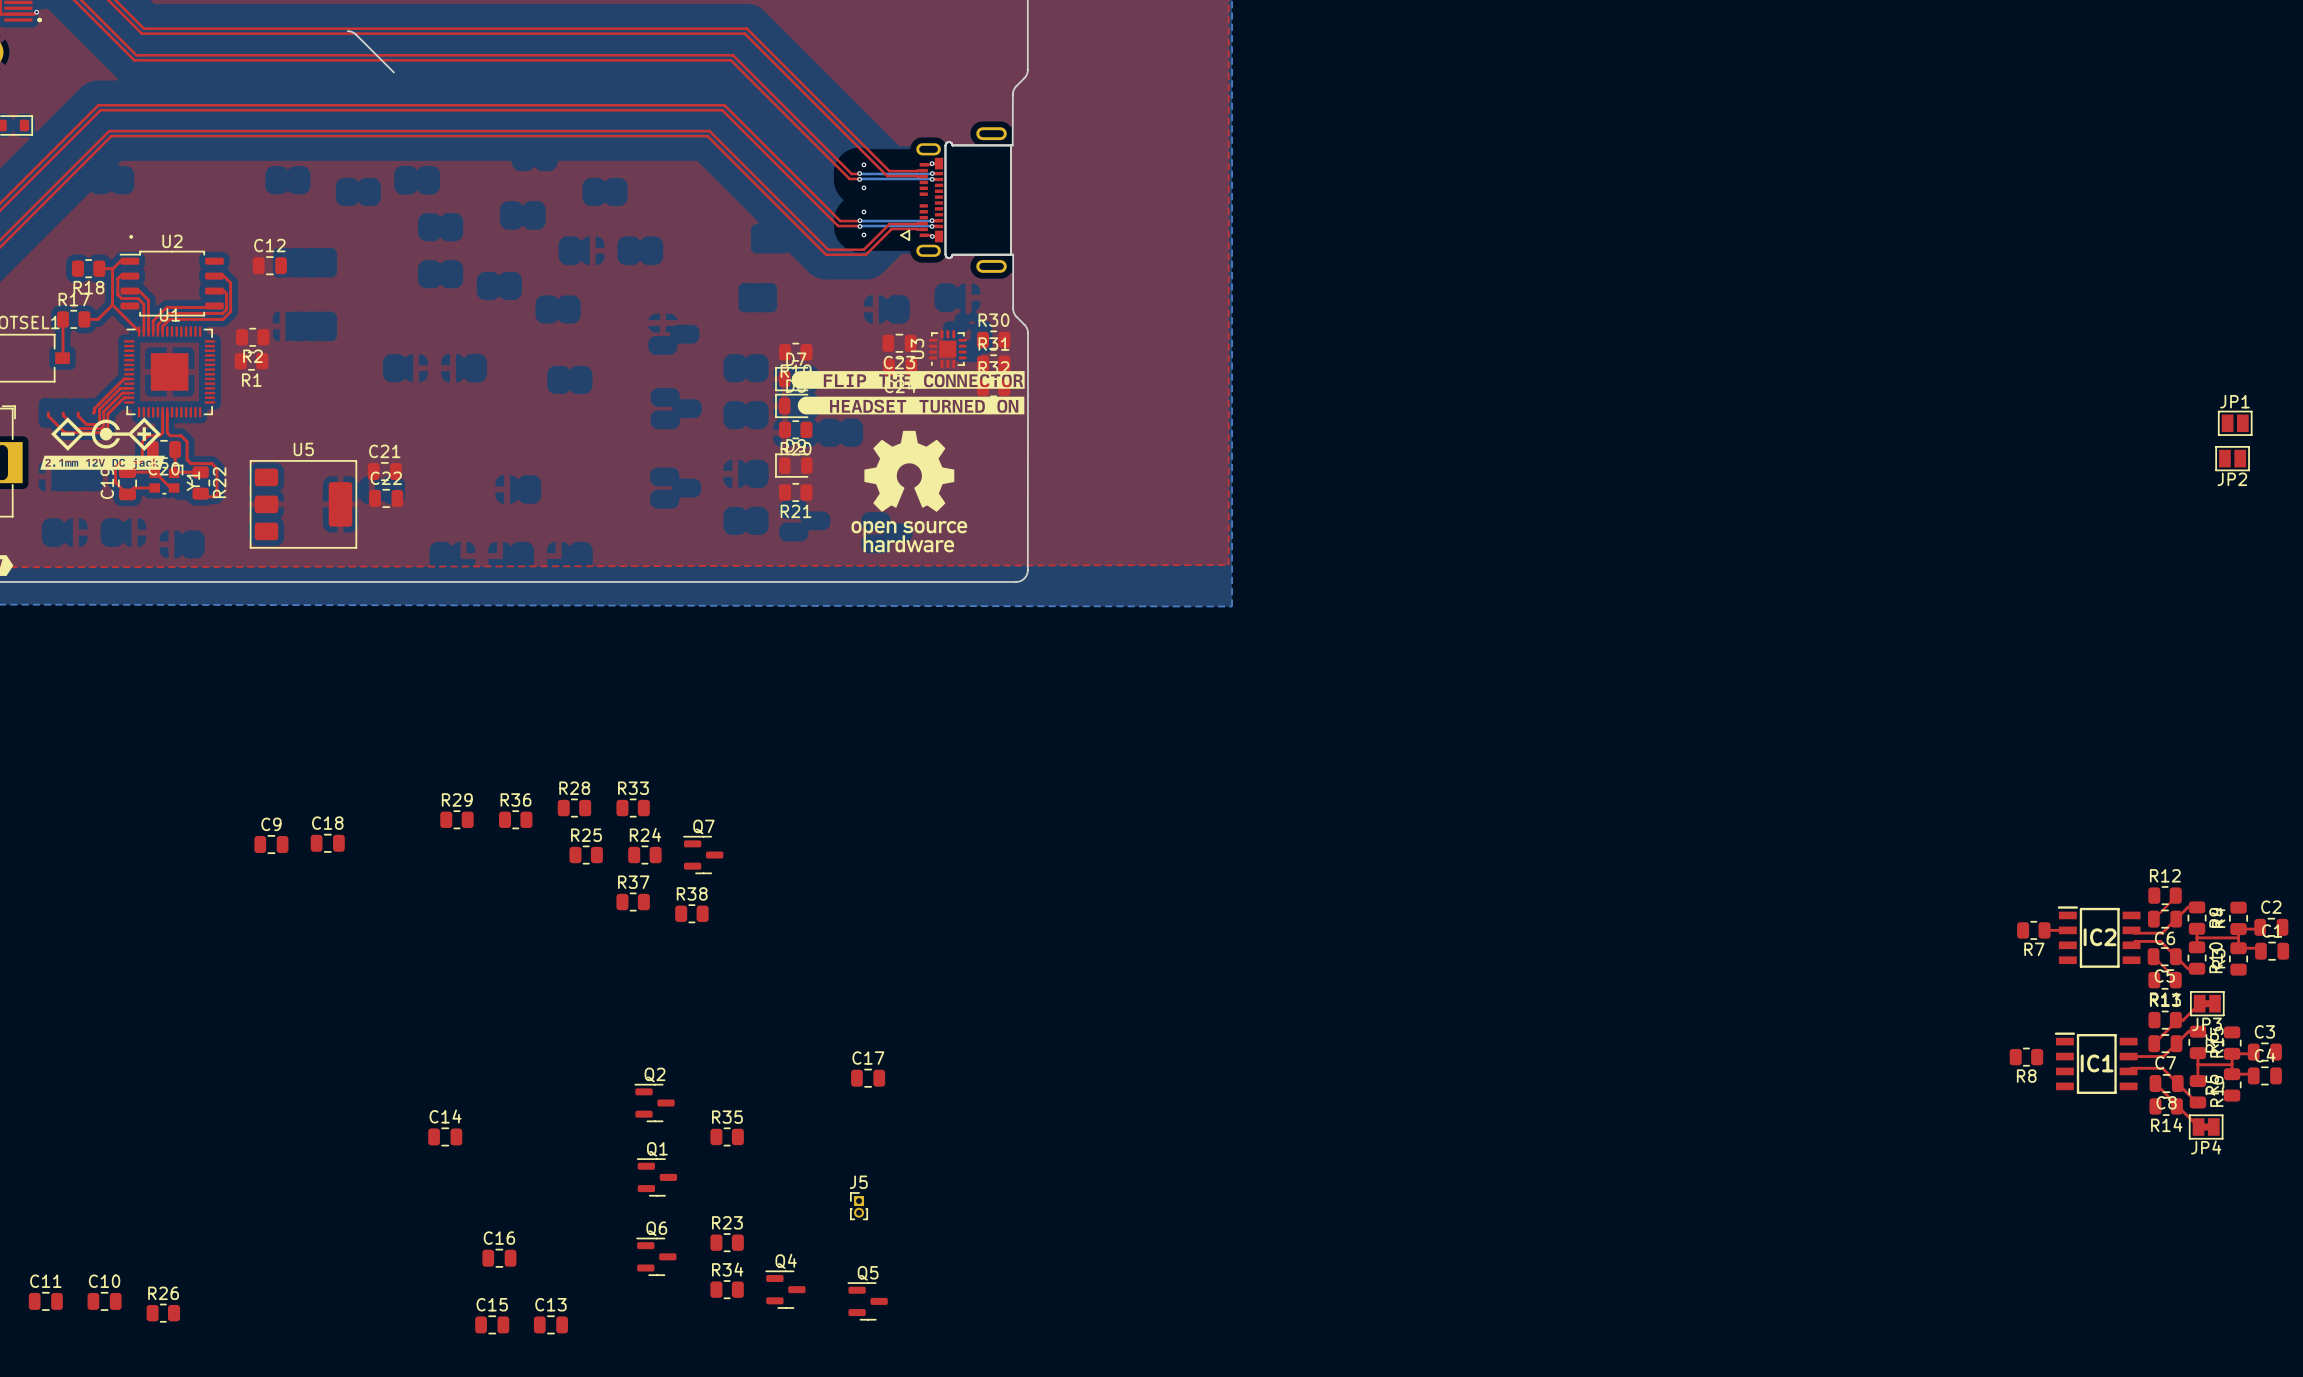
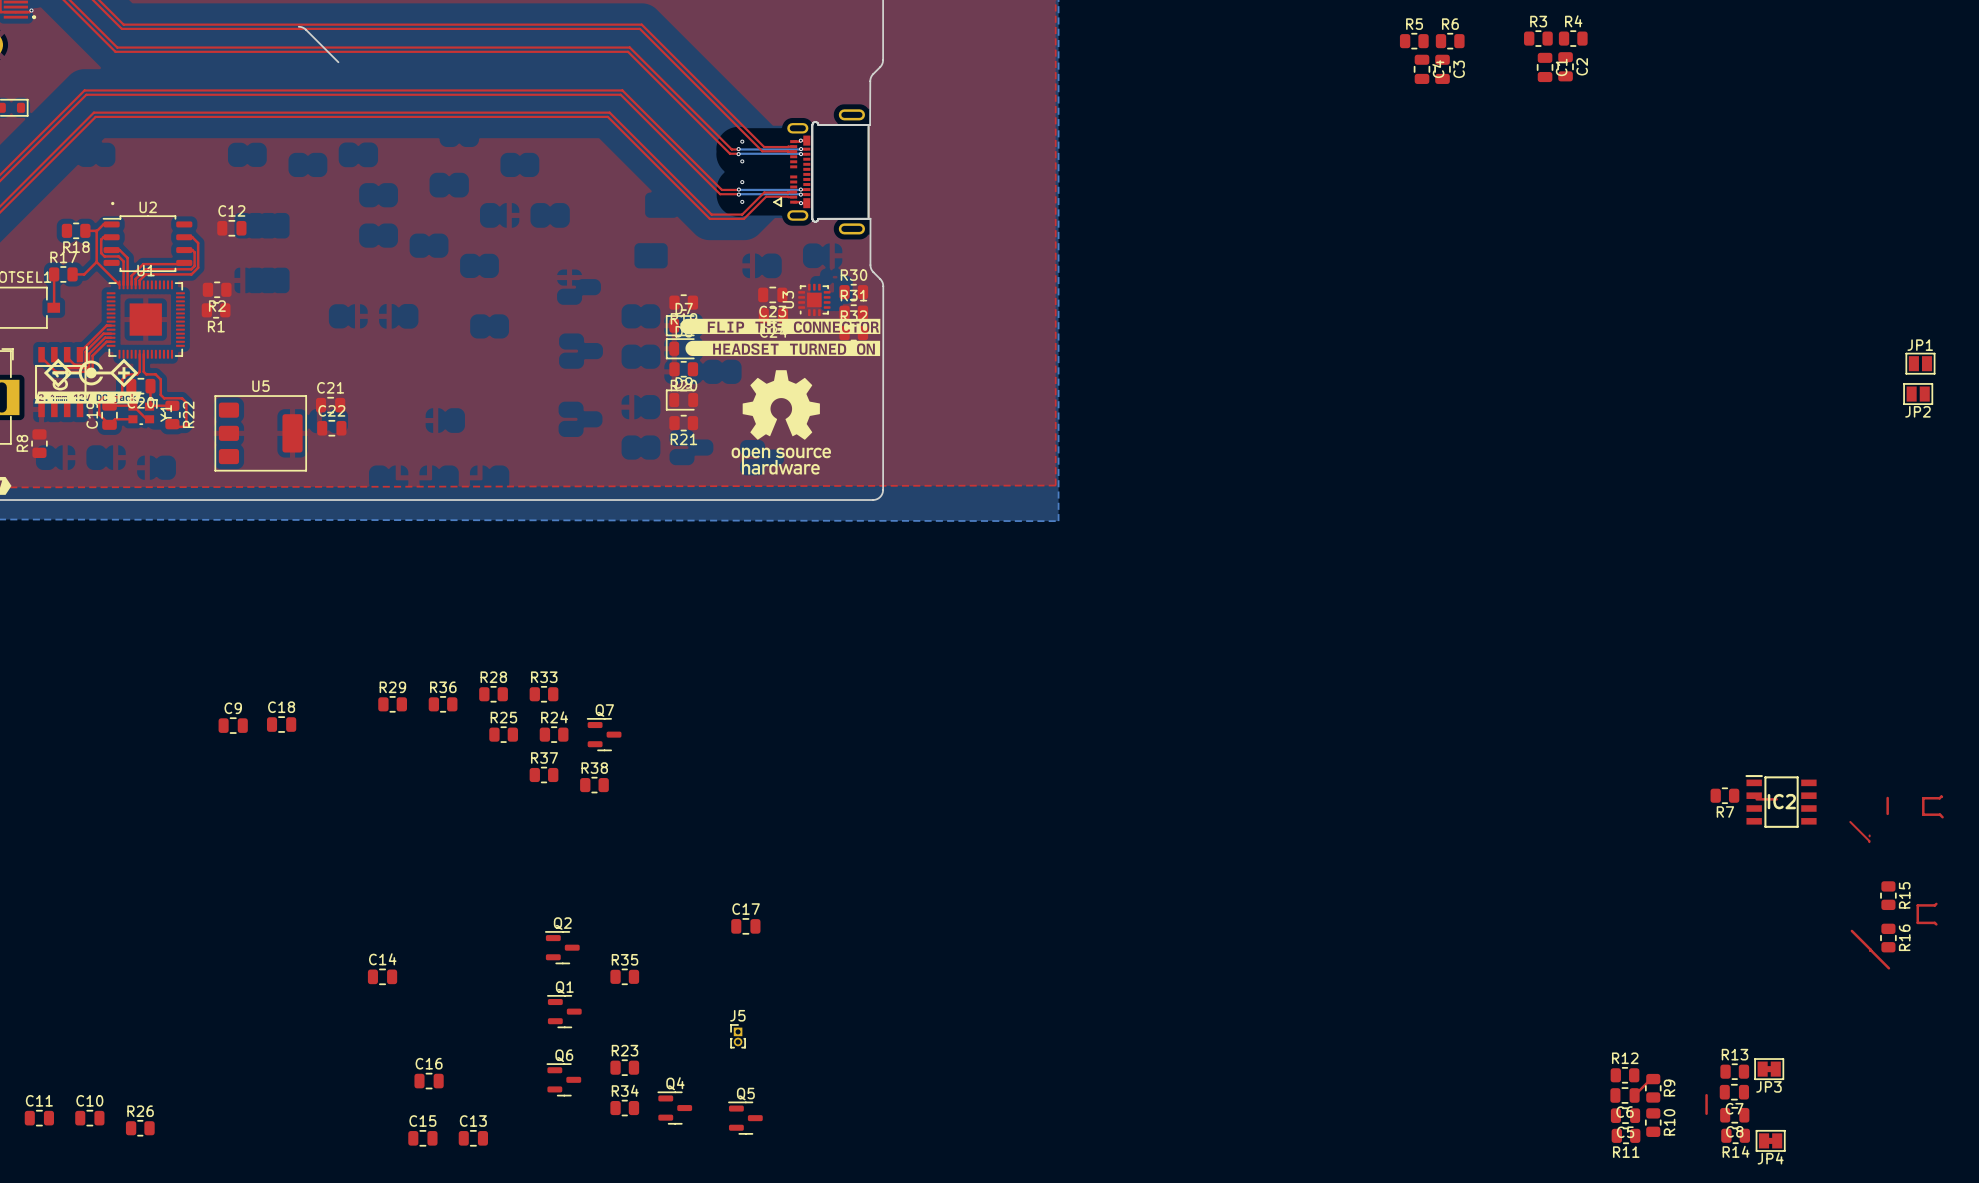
R12 position: (2165, 895) -> (1625, 1075)
top track: (2175, 895) (2153, 919) -> none
top track: (2197, 907) (2187, 907) (2162, 933) (2134, 933) (2131, 930) -> none
R9 position: (2197, 918) -> (1653, 1088)
R4 rotation: 0° (2238, 918) -> 90° clockwise (1573, 38)
R4 position: (2238, 918) -> (1573, 38)
C6 position: (2165, 919) -> (1625, 1095)
C2 rotation: 0° (2271, 927) -> 90° clockwise (1565, 66)
C2 position: (2271, 927) -> (1565, 66)
R7 position: (2033, 930) -> (1724, 795)
IC2 position: (2099, 937) -> (1781, 801)
top track: (2197, 937) (2238, 937) -> none
top track: (2131, 945) (2135, 941) (2160, 941) (2187, 968) (2197, 968) -> none
C1 rotation: 0° (2272, 951) -> 90° clockwise (1545, 67)
C1 position: (2272, 951) -> (1545, 67)
C5 position: (2164, 956) -> (1625, 1115)
R10 position: (2197, 958) -> (1653, 1122)
R3 rotation: 0° (2238, 958) -> 90° clockwise (1538, 38)
R3 position: (2238, 958) -> (1538, 38)
R11 position: (2165, 980) -> (1626, 1135)
top track: (2199, 1003) (2183, 1020) (2175, 1020) (2154, 1043) -> none
JP3 position: (2207, 1003) -> (1769, 1069)
R13 position: (2165, 1020) -> (1734, 1071)
top track: (2197, 1031) (2188, 1031) (2163, 1056) (2128, 1056) -> none
C7 position: (2165, 1043) -> (1734, 1092)
R6 rotation: 0° (2232, 1043) -> 90° clockwise (1450, 41)
R6 position: (2232, 1043) -> (1450, 41)
C3 rotation: 0° (2264, 1052) -> 90° clockwise (1442, 69)
C3 position: (2264, 1052) -> (1442, 69)
top track: (2197, 1053) (2197, 1081) -> none
R8 rotation: 0° (2026, 1057) -> 90° clockwise (39, 443)
R8 position: (2026, 1057) -> (39, 443)
IC1 rotation: 0° (2096, 1063) -> 90° clockwise (61, 381)
IC1 position: (2096, 1063) -> (61, 381)
top track: (2232, 1064) (2197, 1064) -> none
top track: (2128, 1071) (2131, 1068) (2162, 1068) (2196, 1102) -> none
C4 rotation: 0° (2264, 1075) -> 90° clockwise (1422, 69)
C4 position: (2264, 1075) -> (1422, 69)
C8 position: (2166, 1083) -> (1734, 1115)
R5 rotation: 0° (2232, 1084) -> 90° clockwise (1414, 41)
R5 position: (2232, 1084) -> (1414, 41)
R14 position: (2166, 1106) -> (1735, 1135)
JP4 position: (2206, 1127) -> (1770, 1140)
top track: none -> (1653, 1079) (1634, 1095)
top track: none -> (1706, 1095) (1706, 1113)

